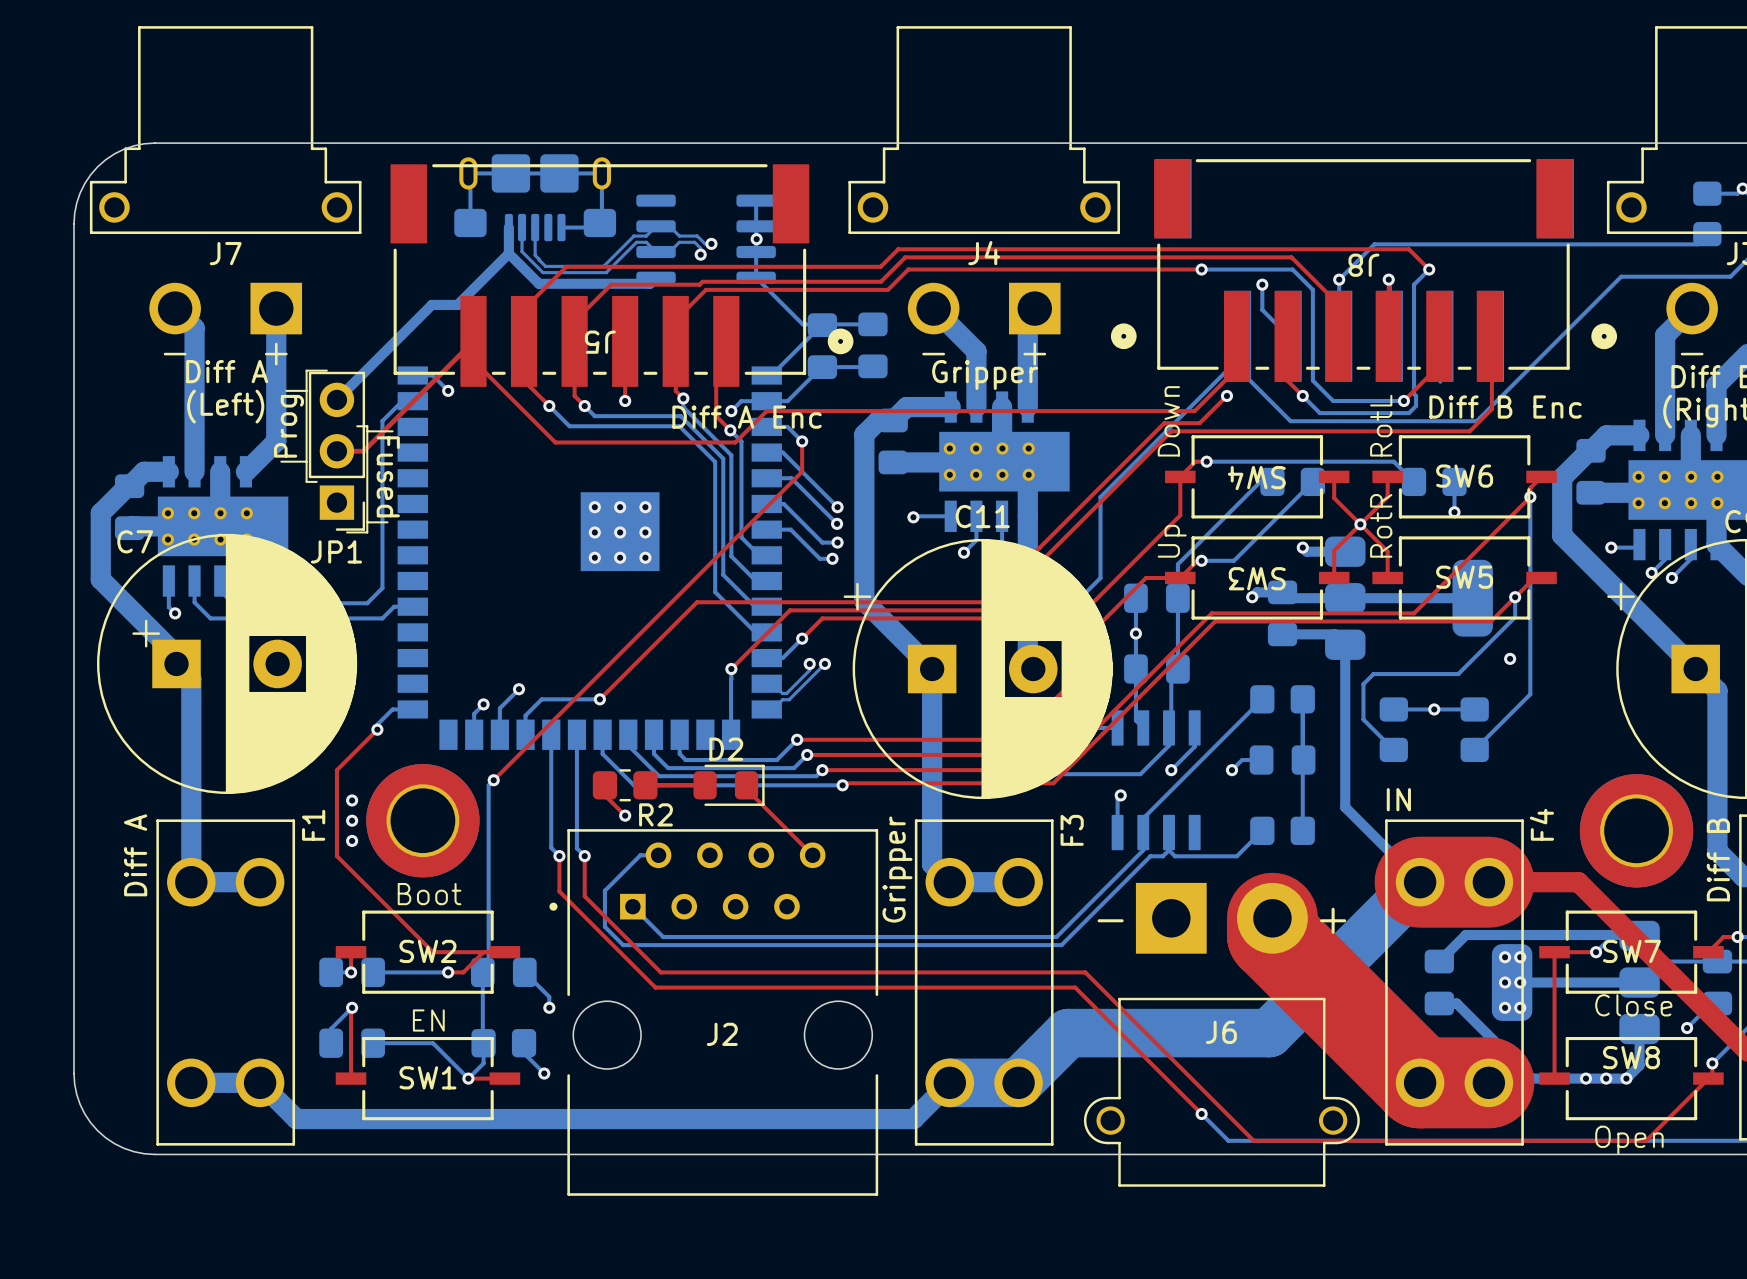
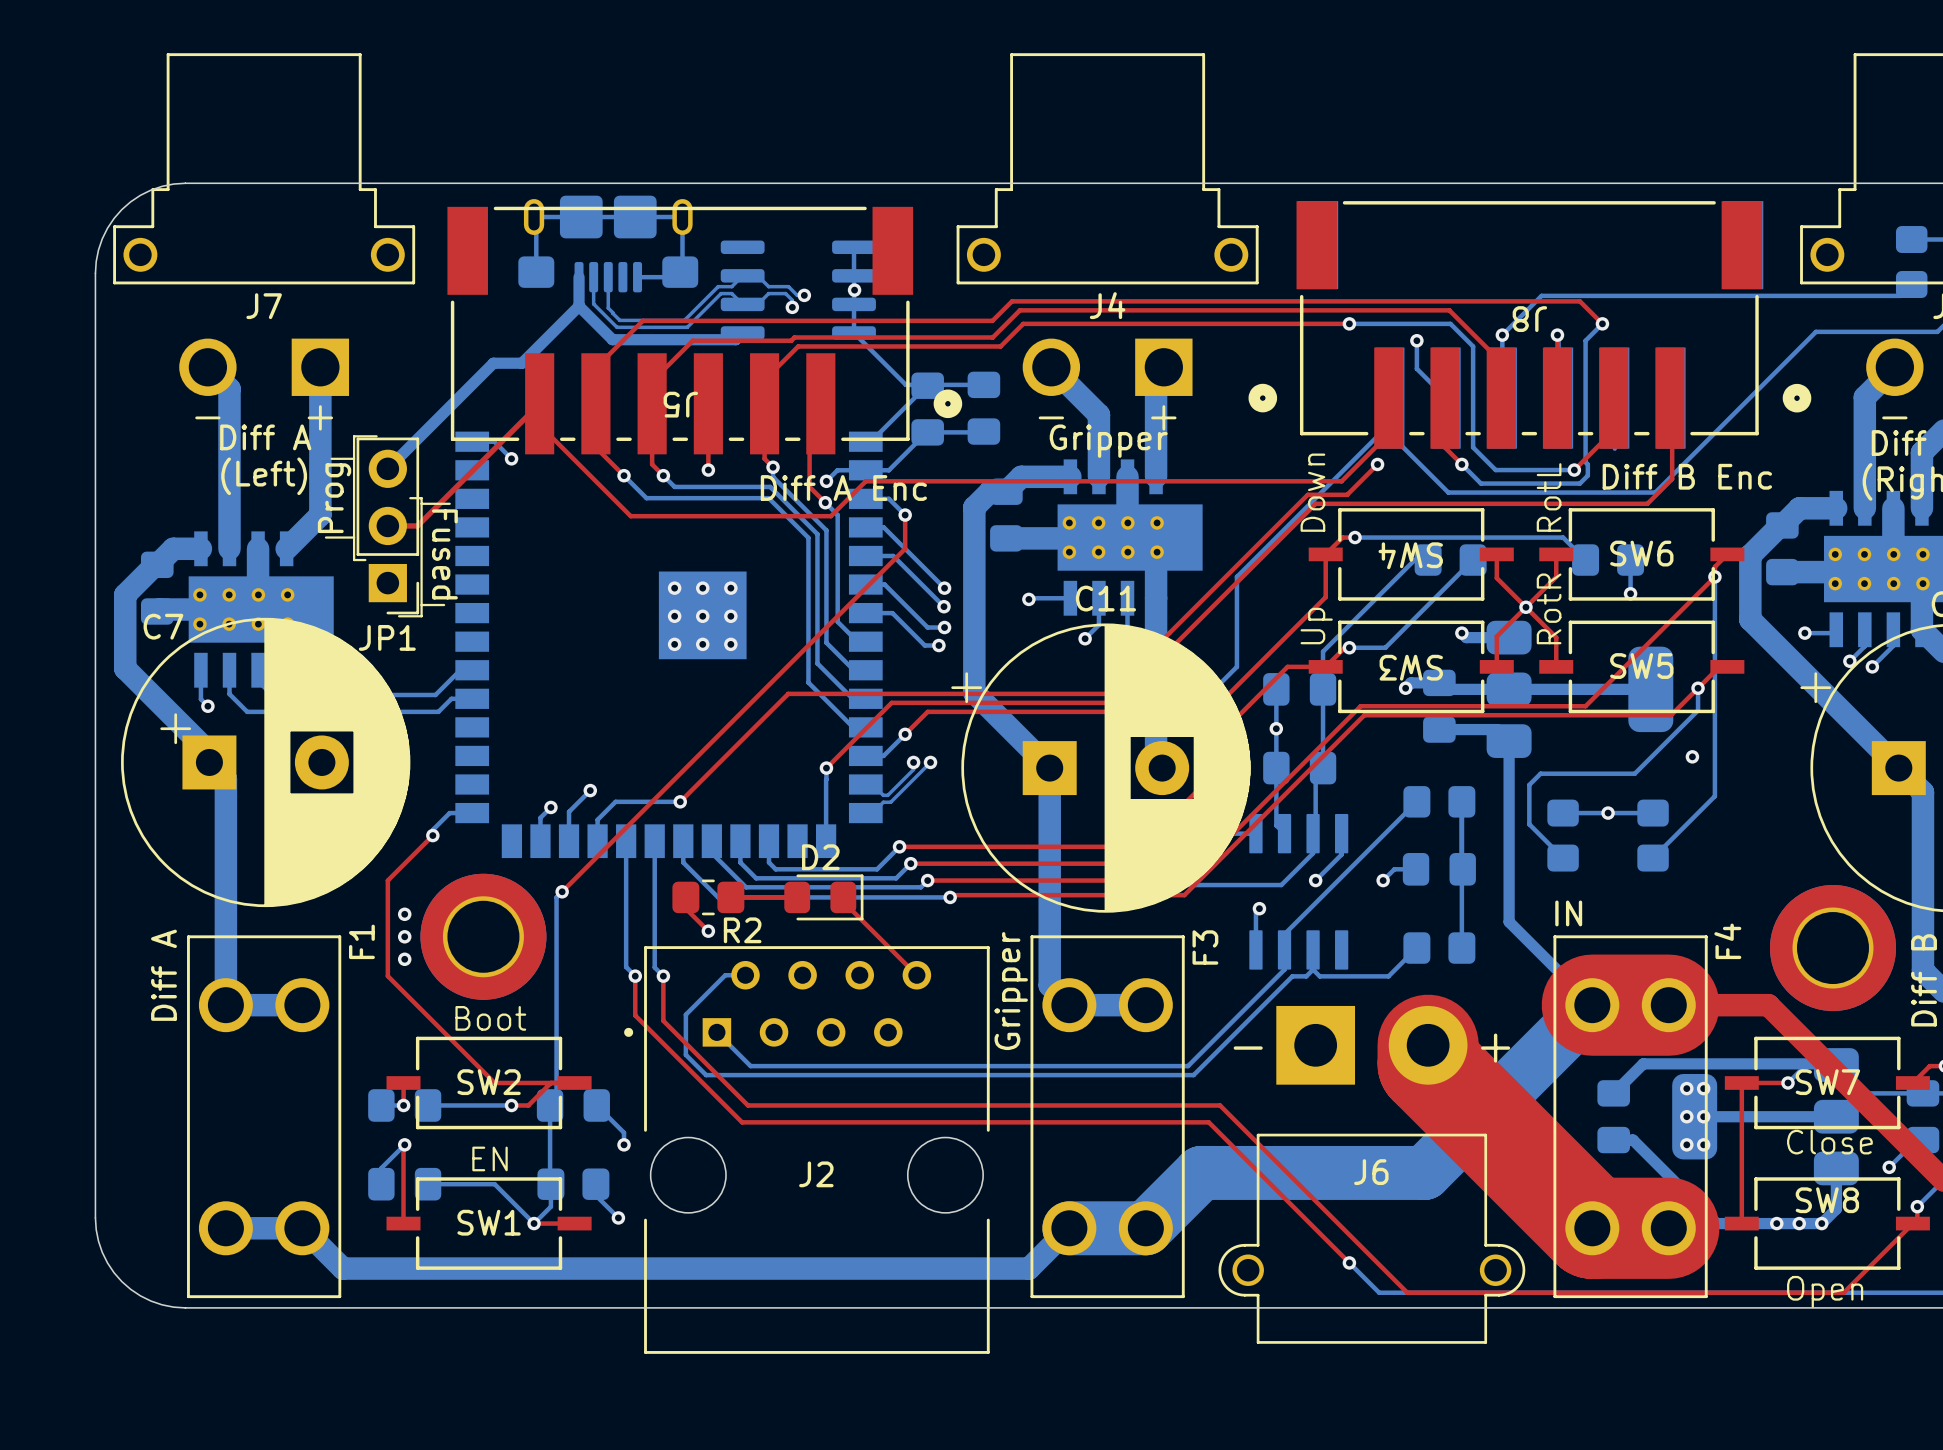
bottom track: (412, 401) (402, 401) (382, 421) (382, 588) (367, 603) -> (460, 670) (435, 694) (421, 694)

